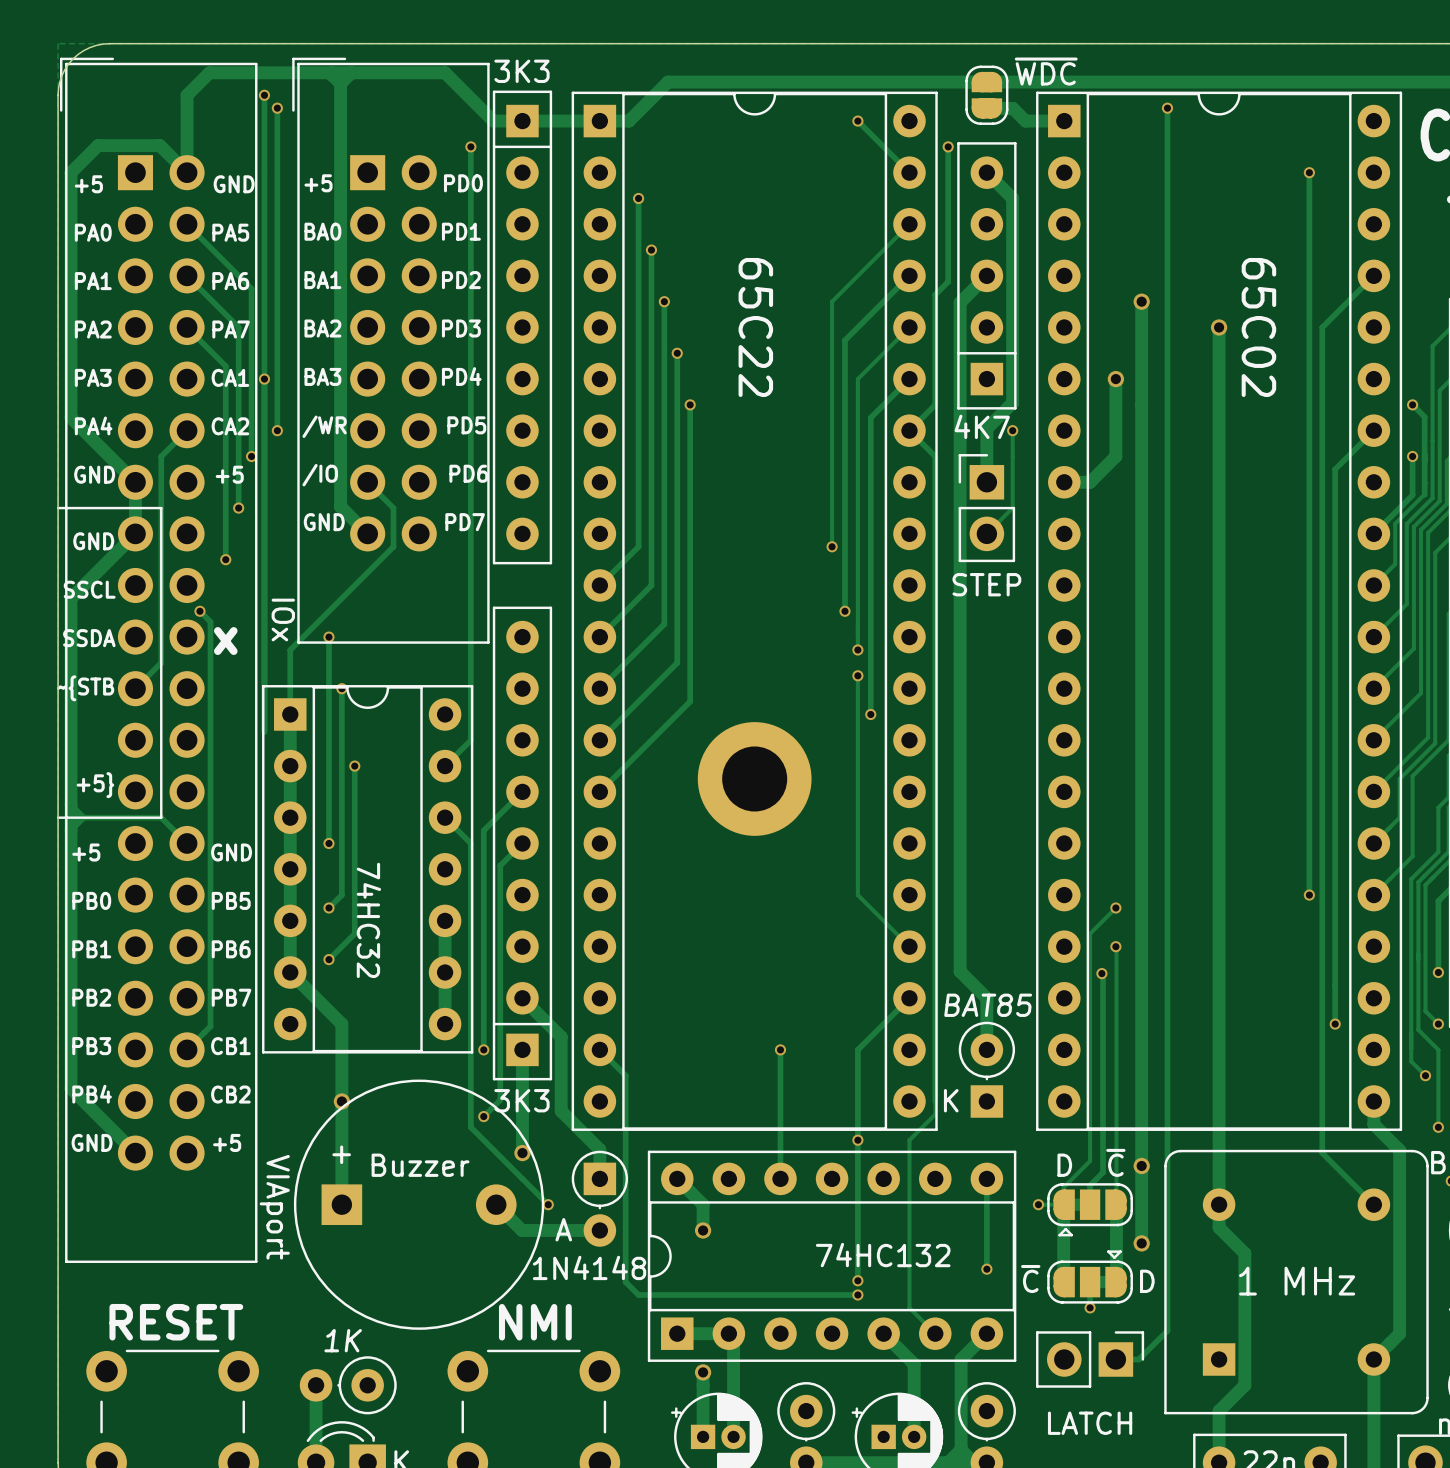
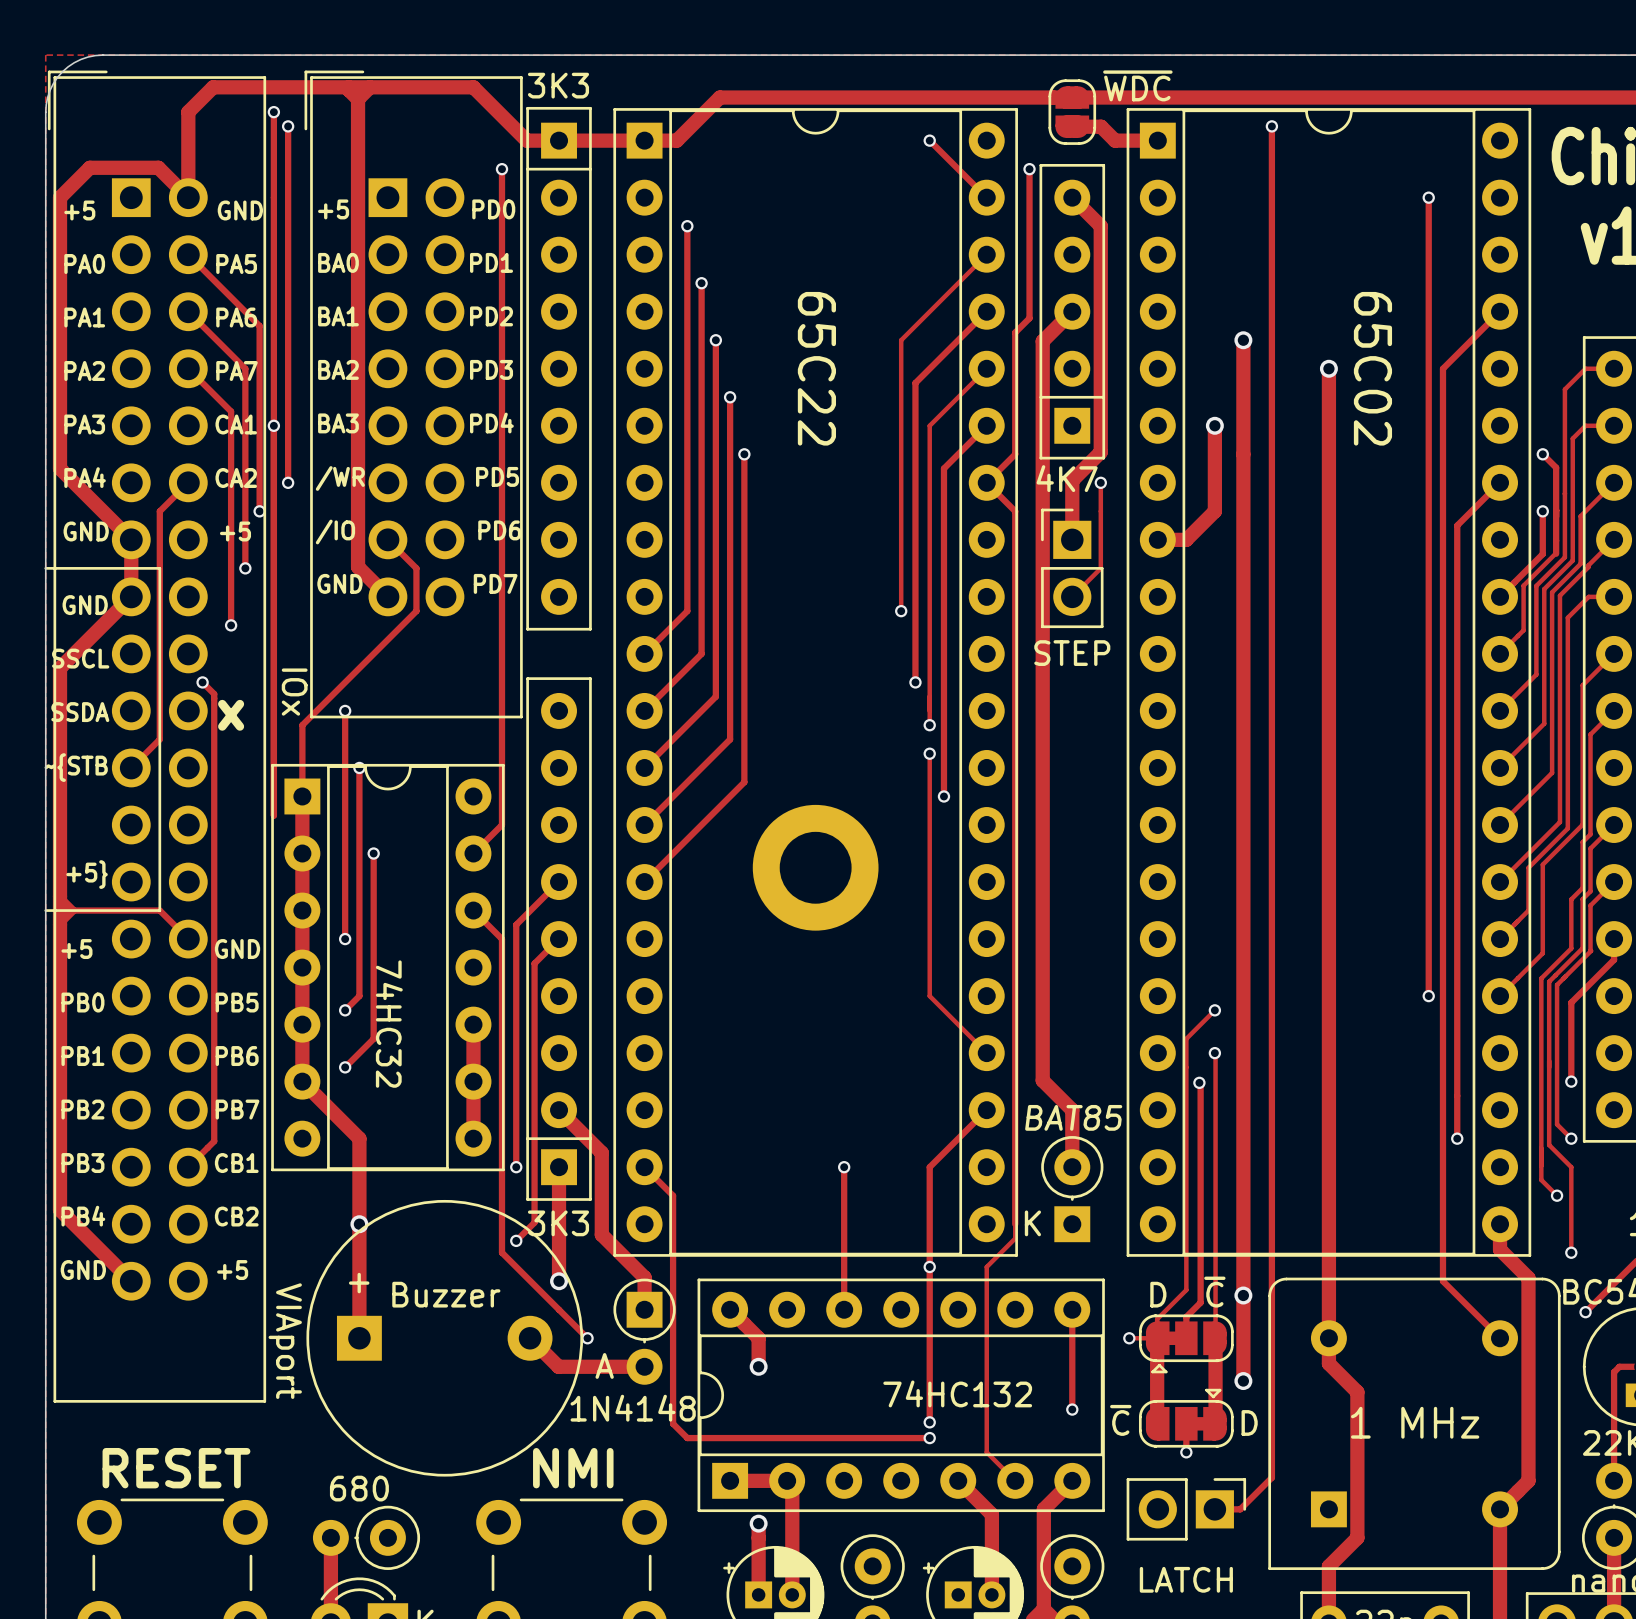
part value: 1K (343, 1340) -> 680 (359, 1488)

